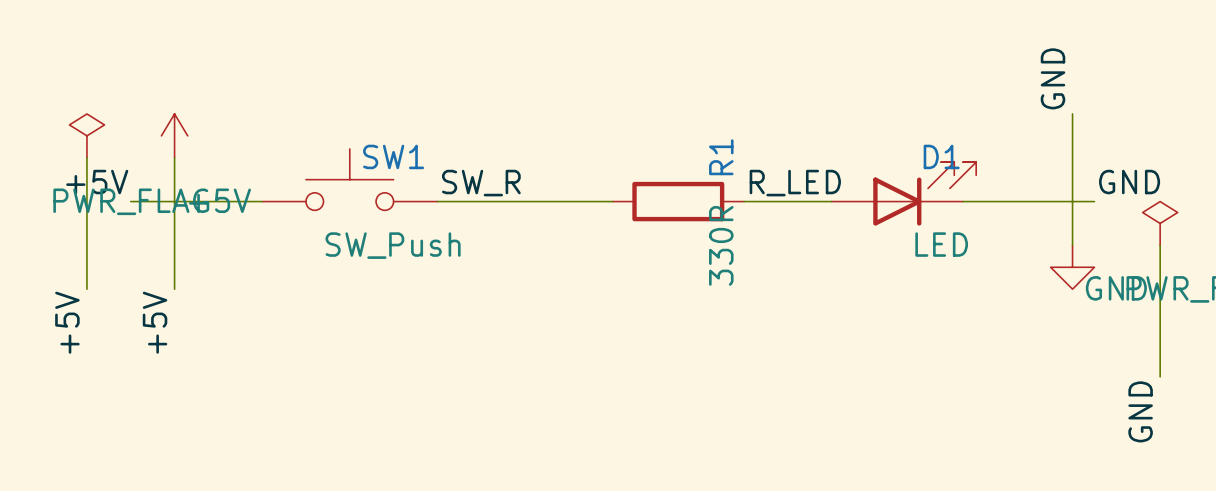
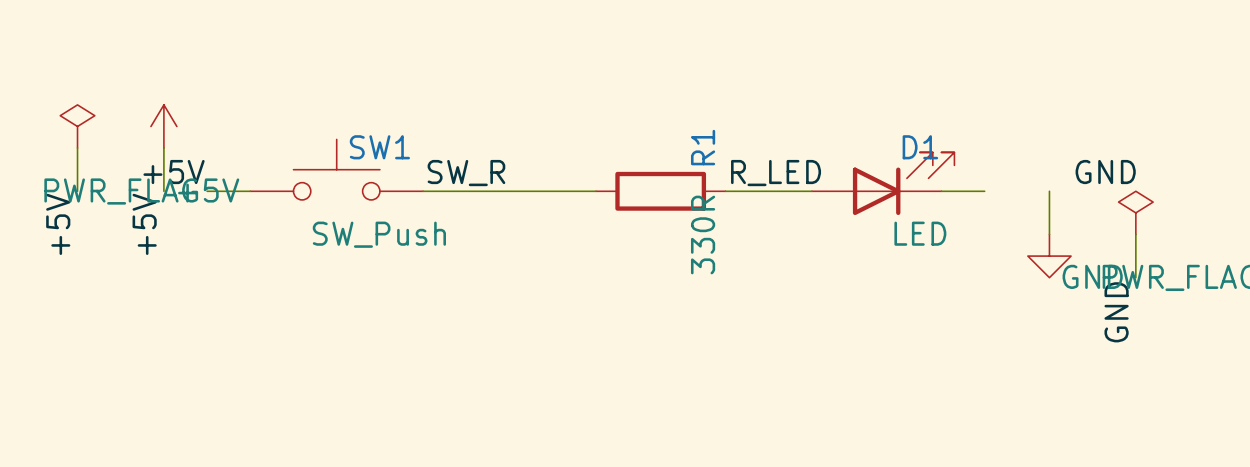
label: GND (1053, 78) -> none
wire: (1072, 113) (1072, 201) -> none
label rotation: 0° (97, 182) -> 90° counterclockwise (58, 224)
label: none -> +5V (174, 172)
wire: (86, 201) (86, 289) -> none
wire: (130, 201) (218, 201) -> none
wire: (174, 201) (174, 289) -> none
wire: (1006, 201) (1094, 201) -> none
label: none -> +5V (144, 224)
wire: (1160, 289) (1160, 376) -> none
label: +5V (67, 322) -> none
label: +5V (155, 322) -> none
label position: GND (1140, 411) -> GND (1116, 312)

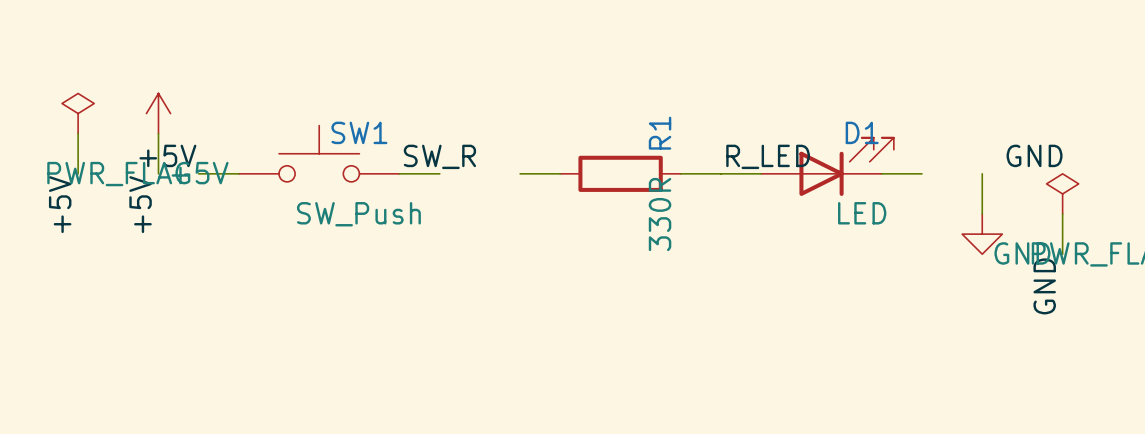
label position: R_LED (776, 173) -> R_LED (768, 156)
wire: (466, 191) (552, 191) -> none

